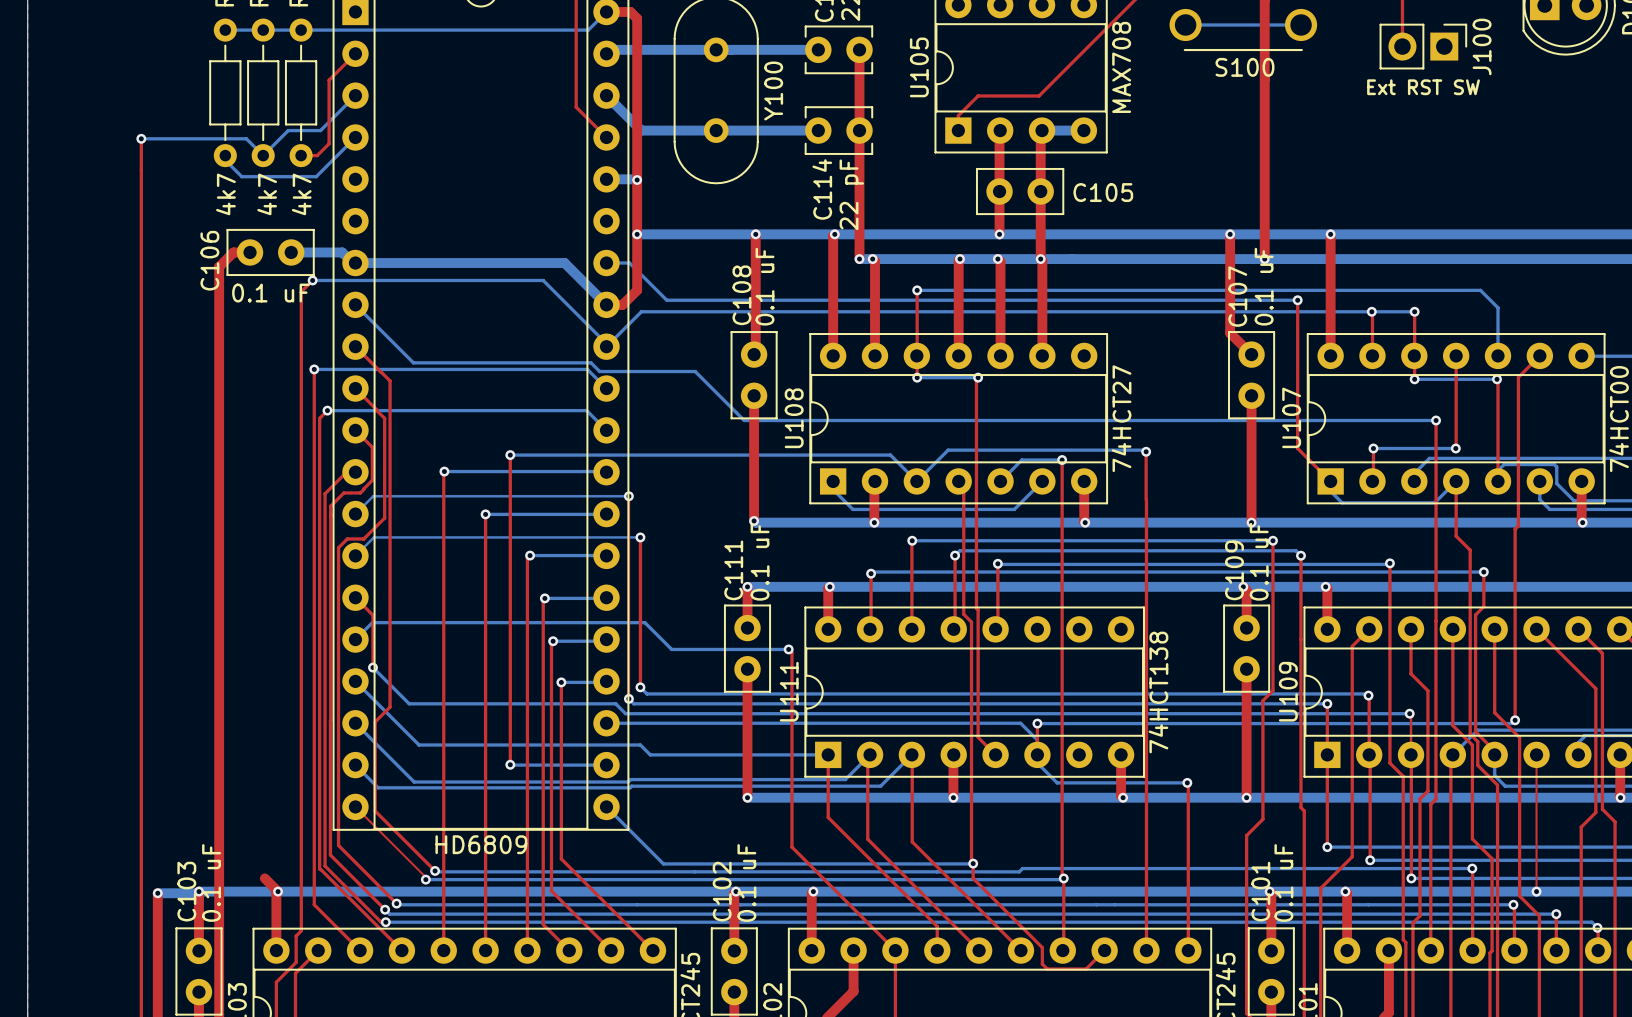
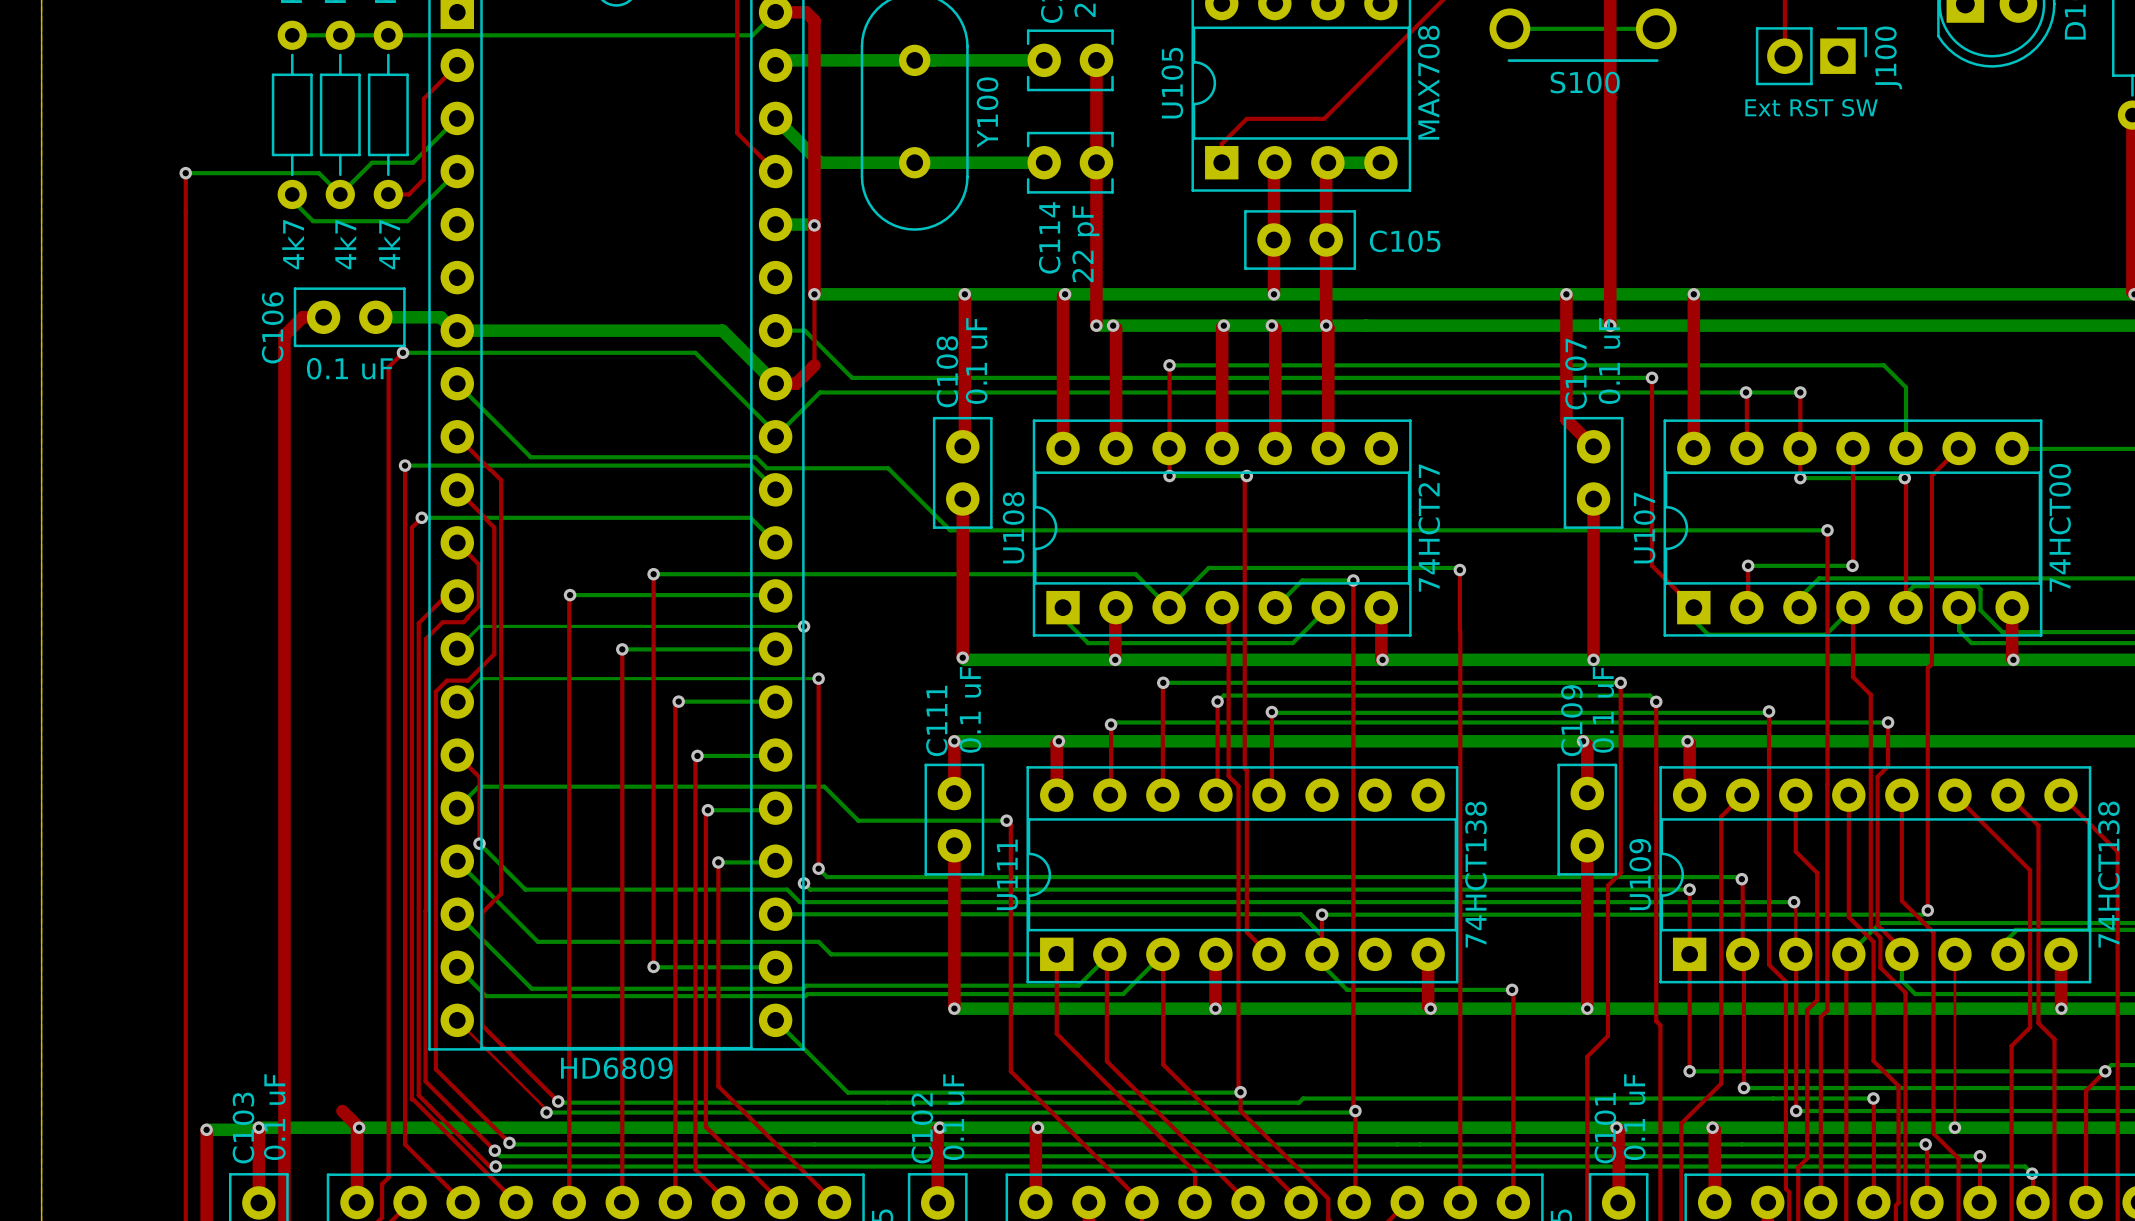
top track width: thick (637, 234) (637, 290) -> thin (814, 294) (814, 365)

